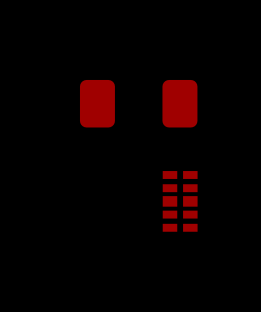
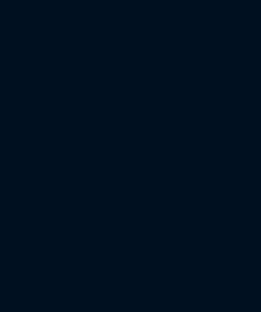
part: (138, 103) -> none
part: (180, 201) -> none

